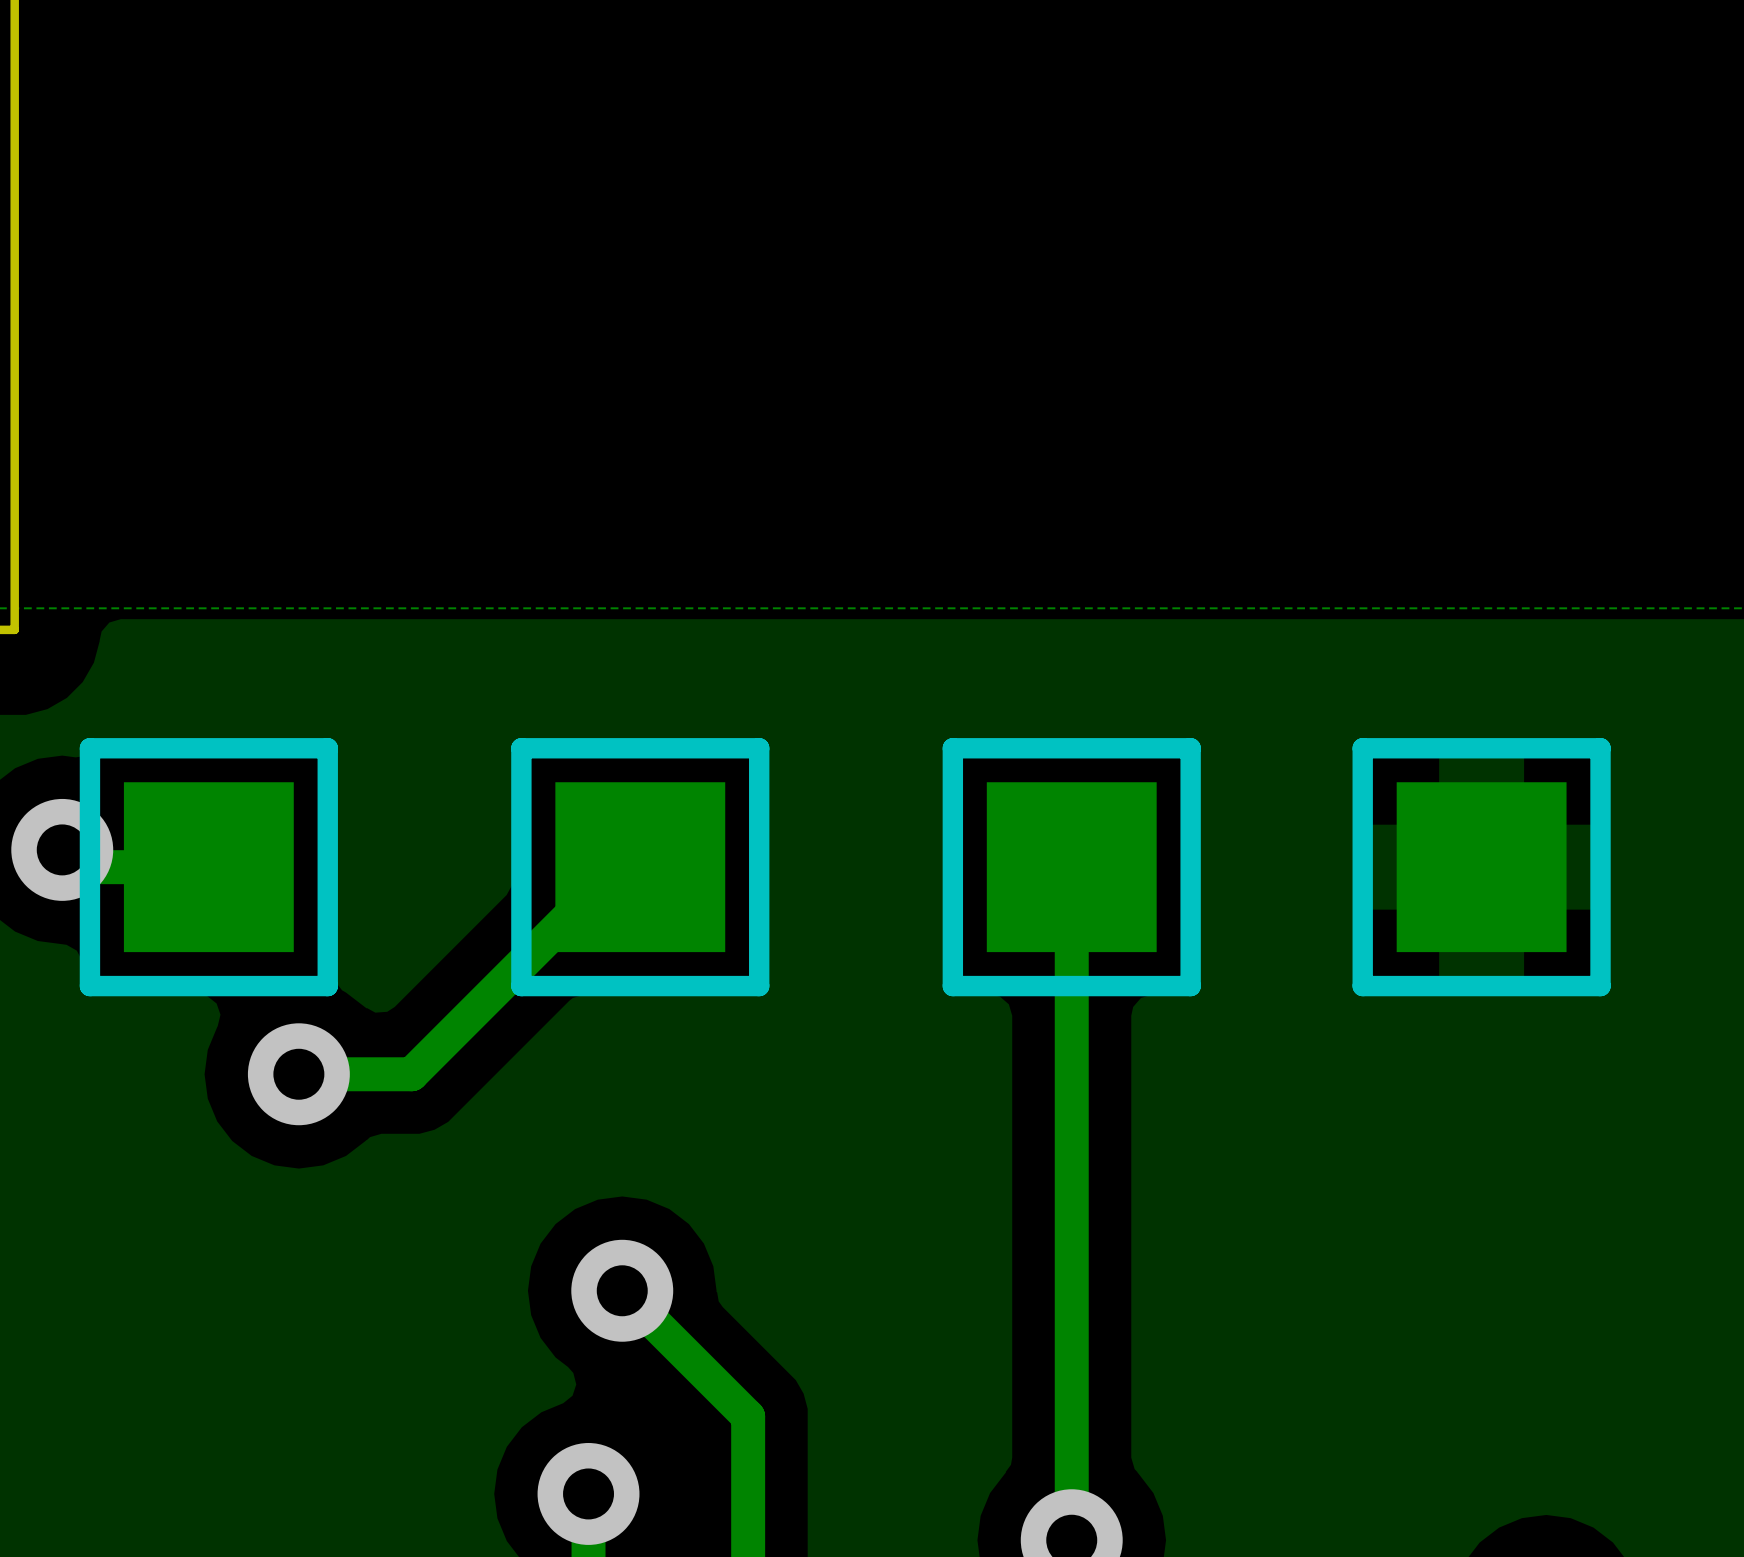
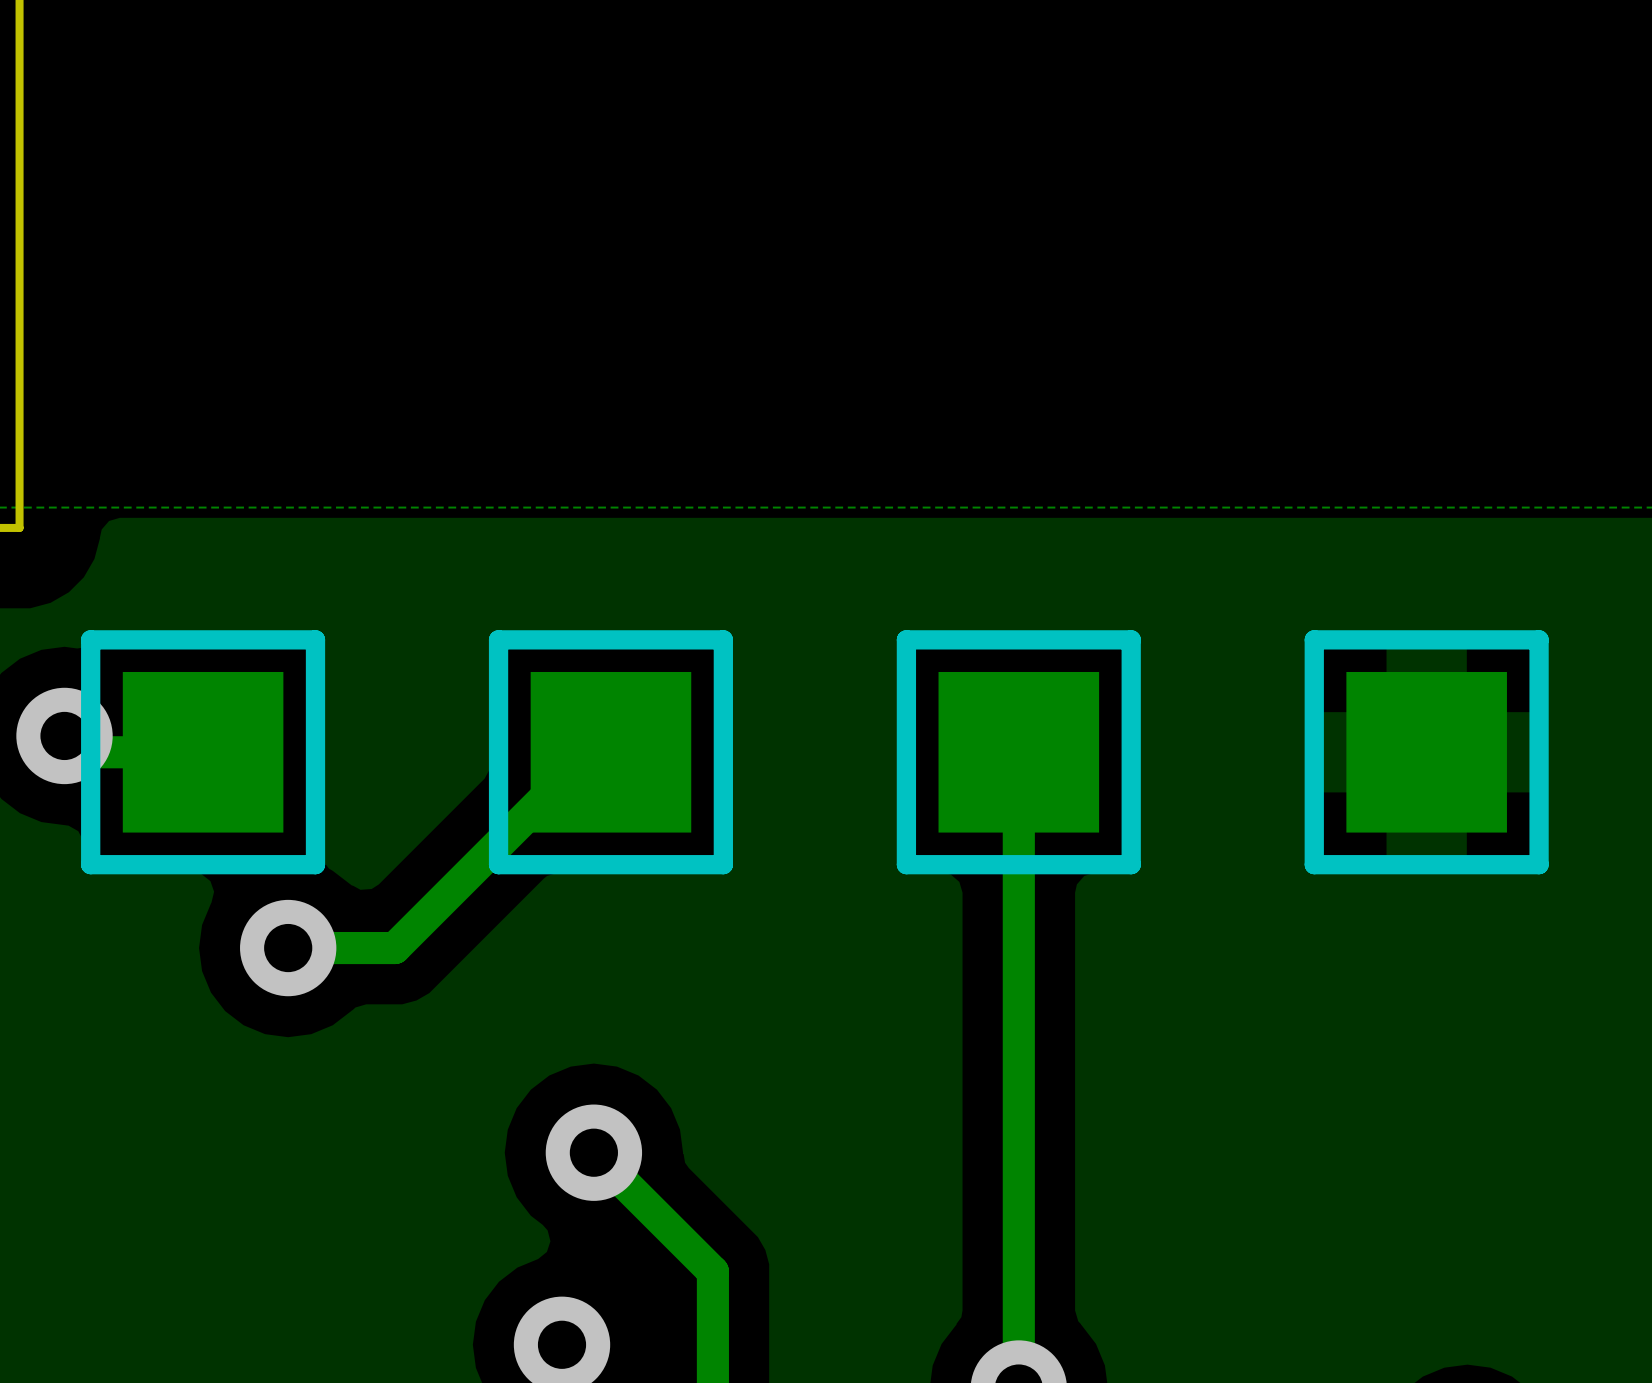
part position: (1481, 867) -> (1426, 752)

